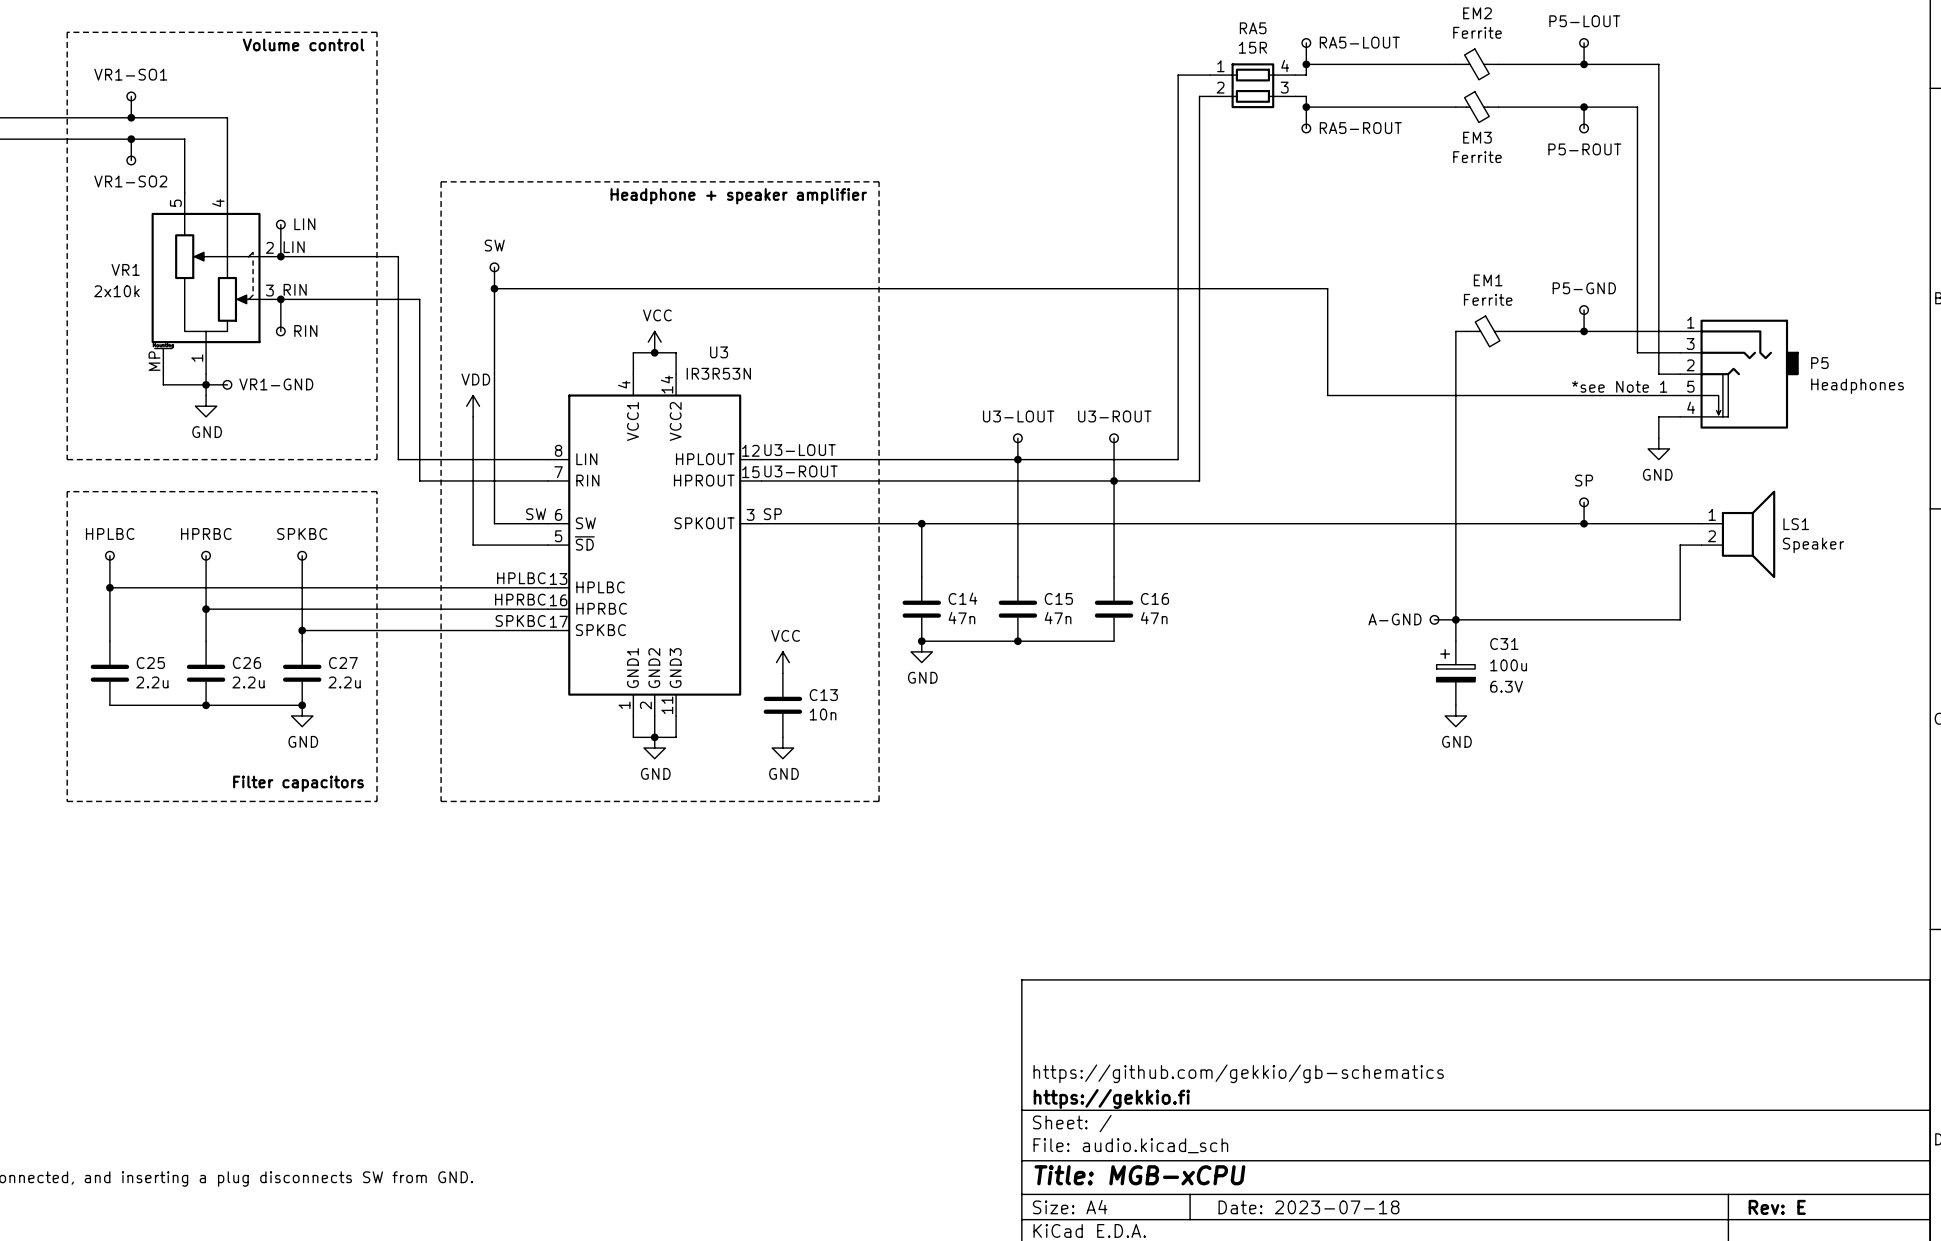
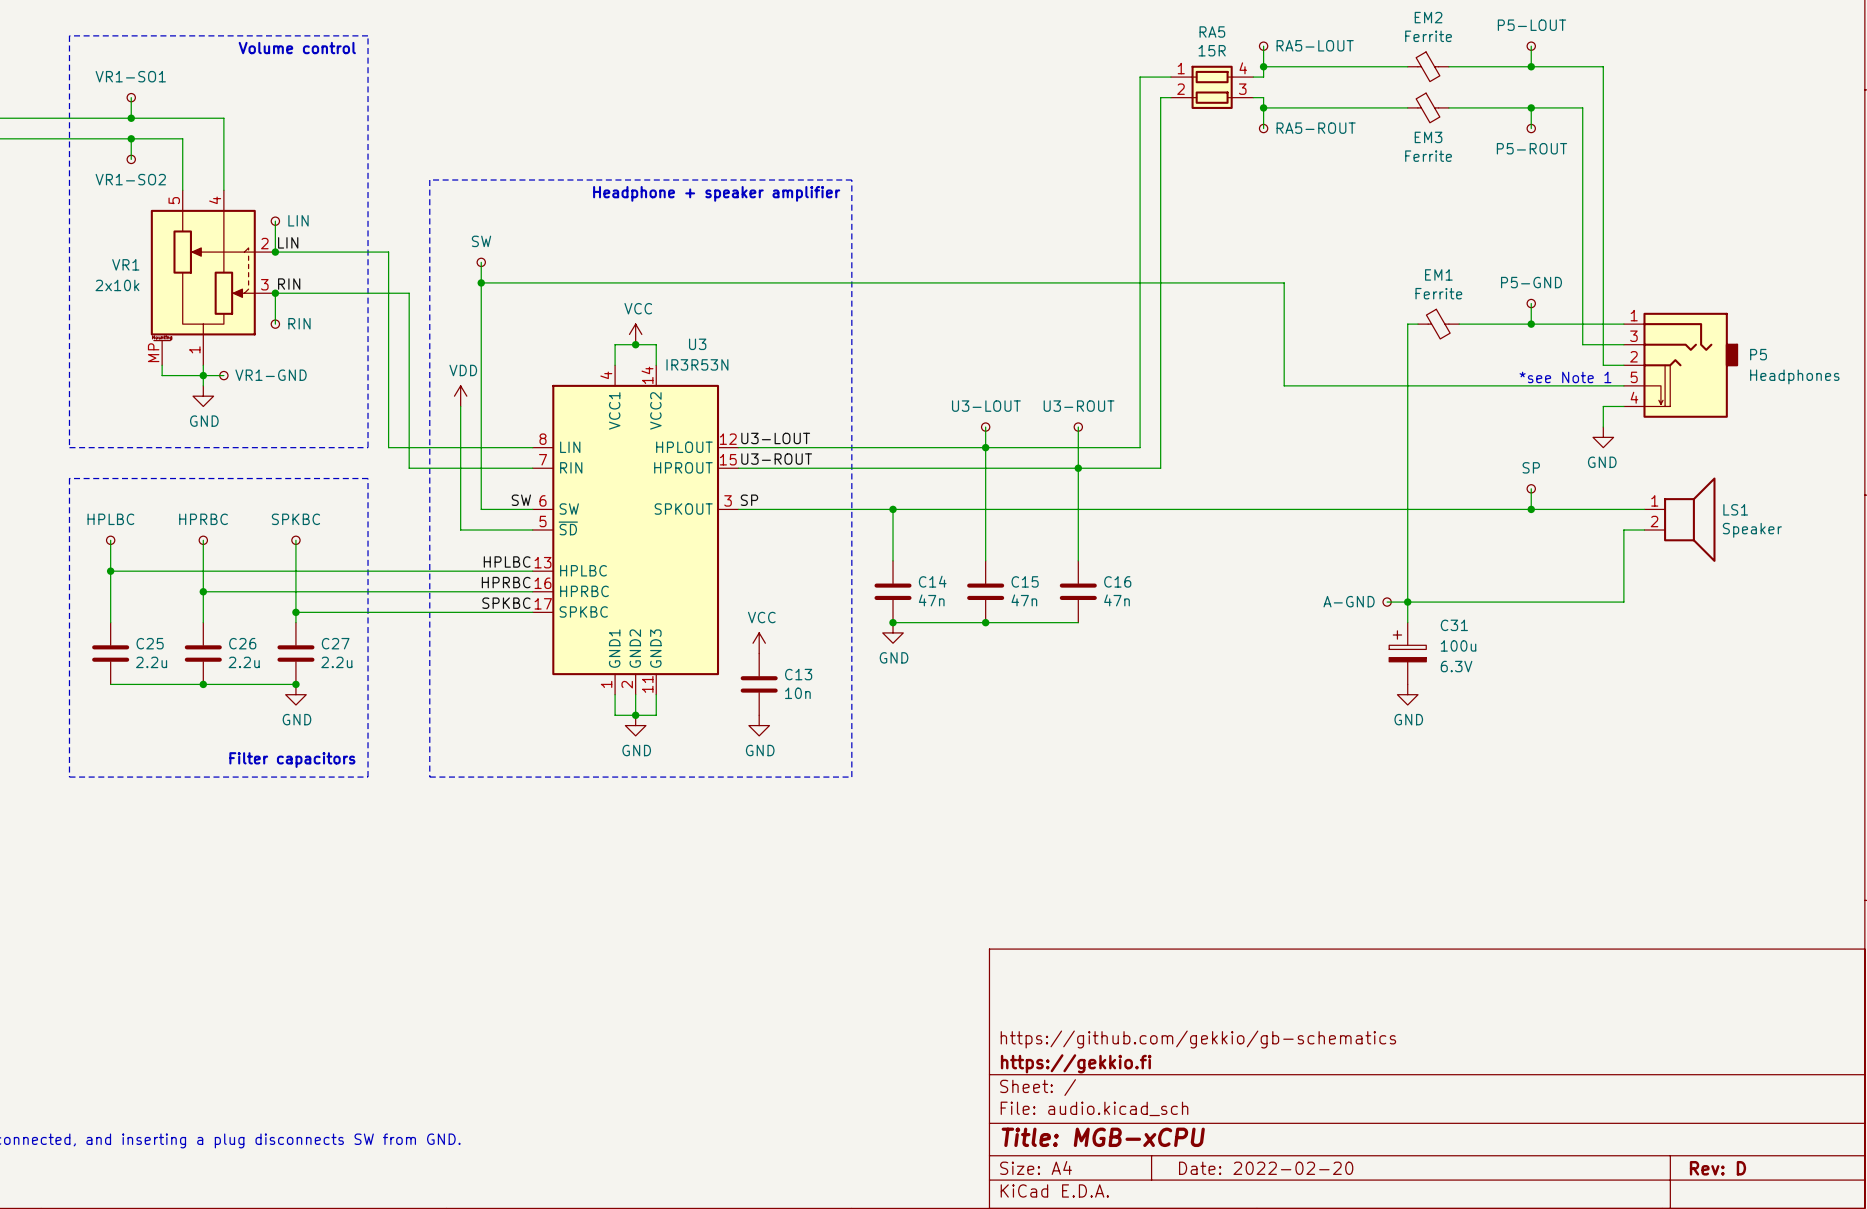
title block: Date: 2023-07-18 (1308, 1207) -> Date: 2022-02-20 (1266, 1168)
title block: Rev: E (1777, 1207) -> Rev: D (1717, 1168)

